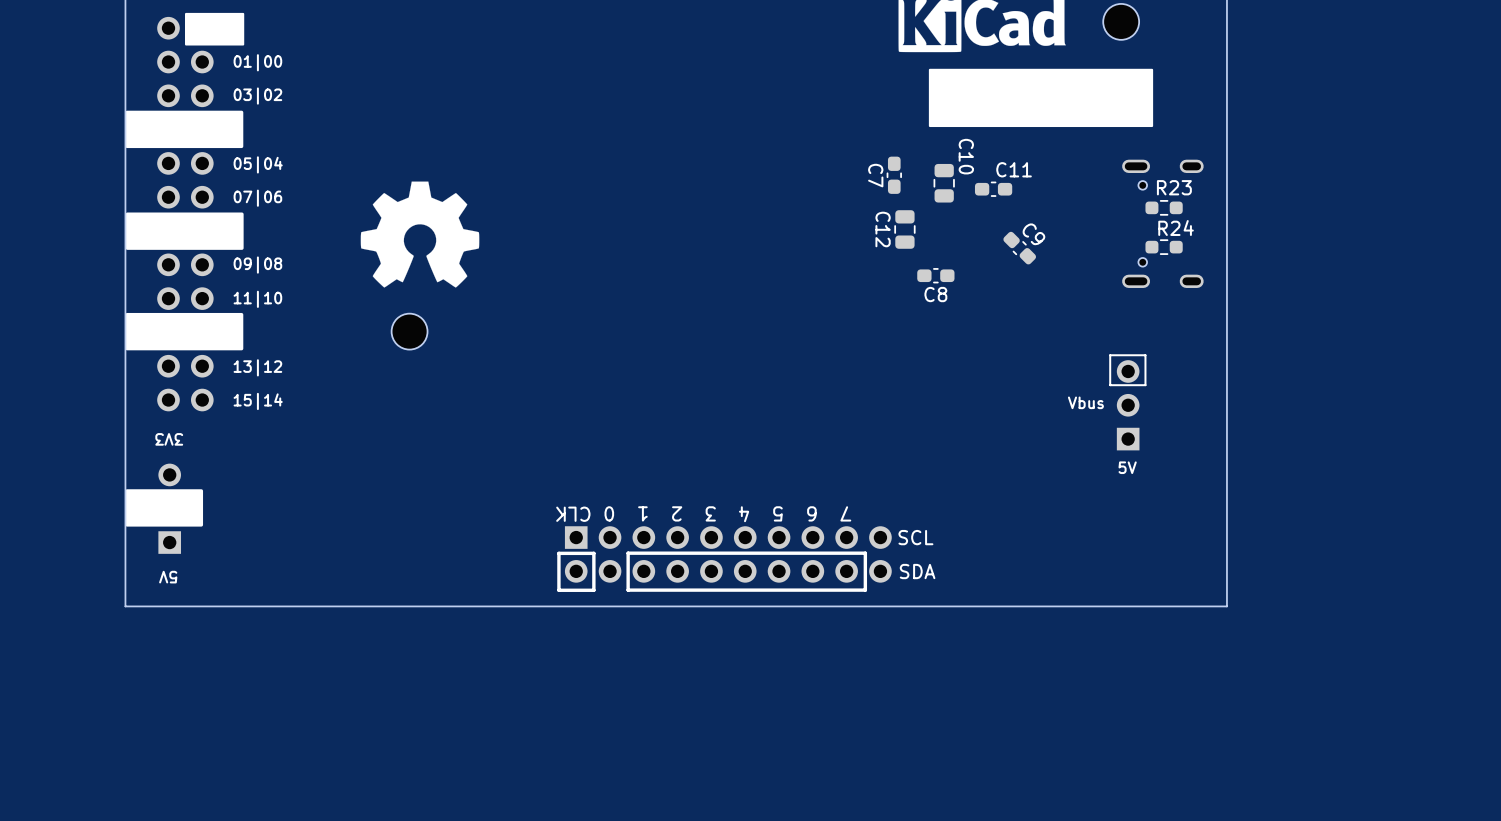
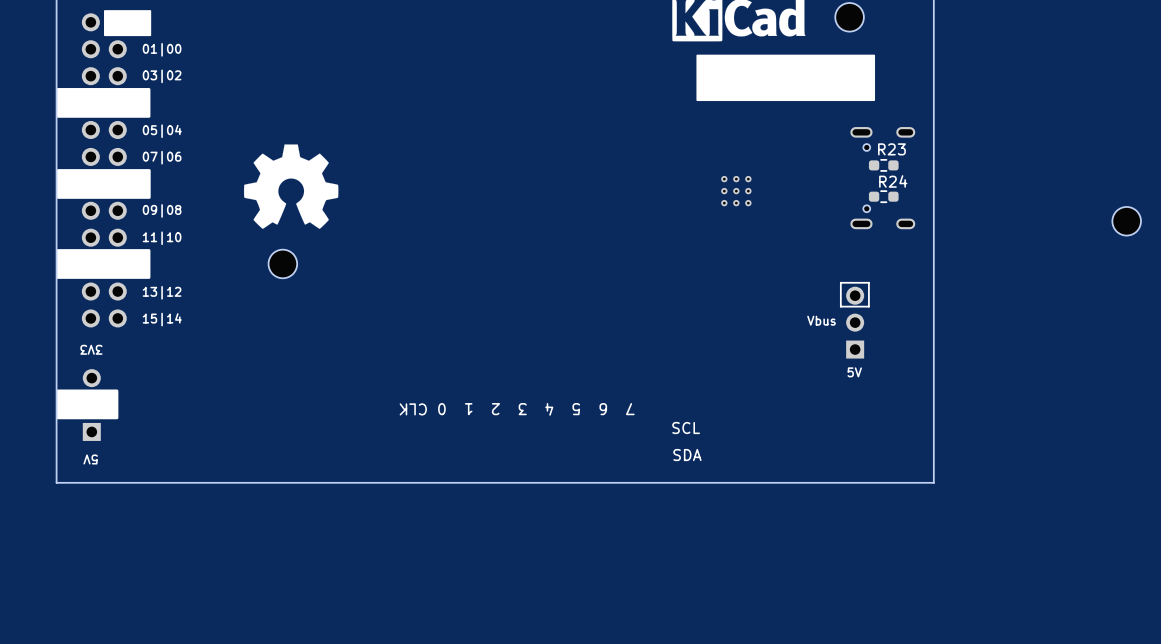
C7: (894, 175) -> none
C10: (944, 183) -> none
C11: (993, 189) -> none
C12: (904, 229) -> none
part: none -> (736, 191)
C9: (1019, 248) -> none
C8: (935, 275) -> none
part: none -> (1126, 221)
line: (593, 553) (558, 553) (558, 590) (593, 590) (593, 553) -> none
line: (865, 553) (628, 553) (628, 590) (865, 590) (865, 553) -> none
part: (728, 554) -> none

